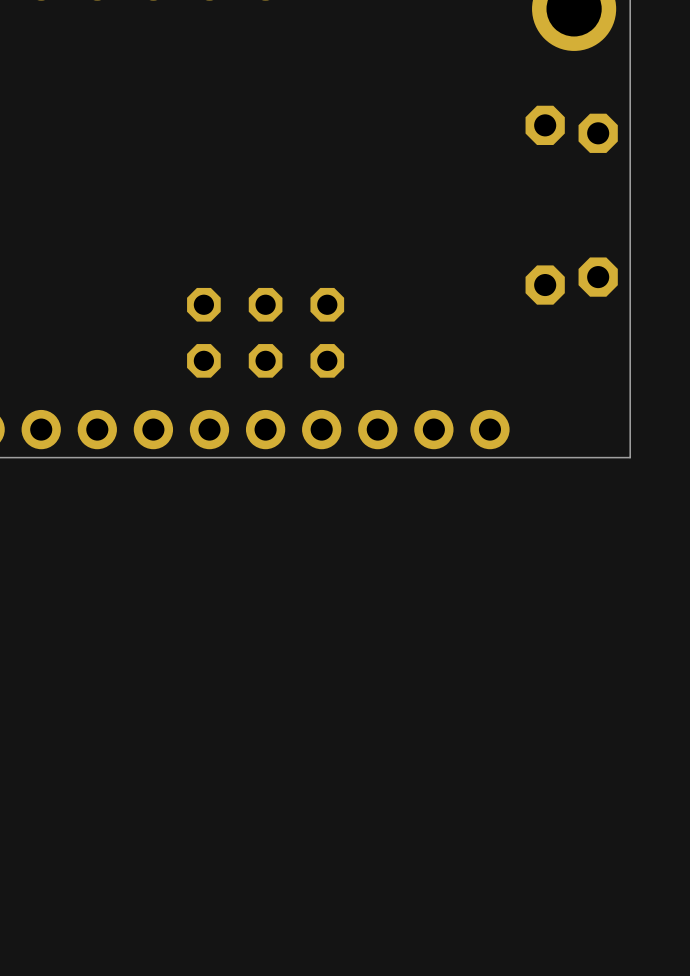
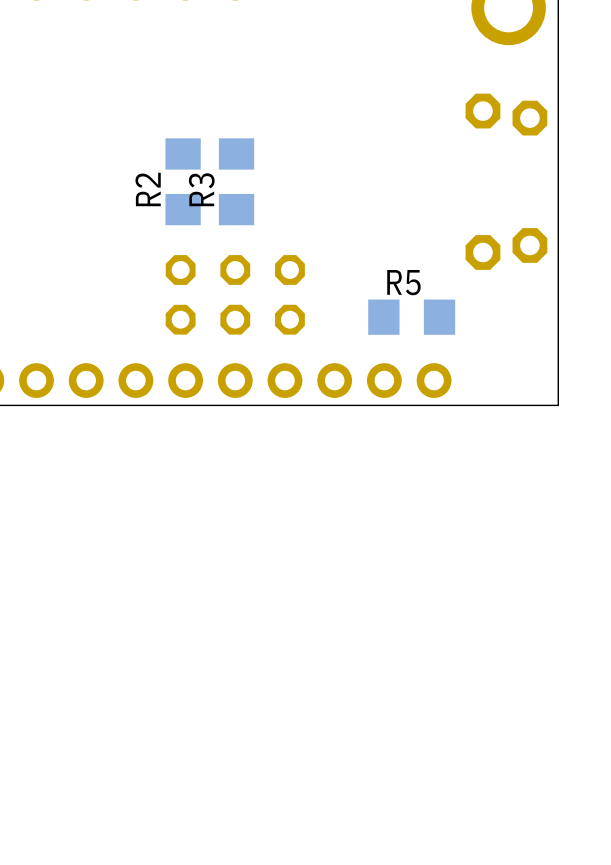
R2: none -> (183, 181)
R3: none -> (236, 181)
R5: none -> (411, 317)

